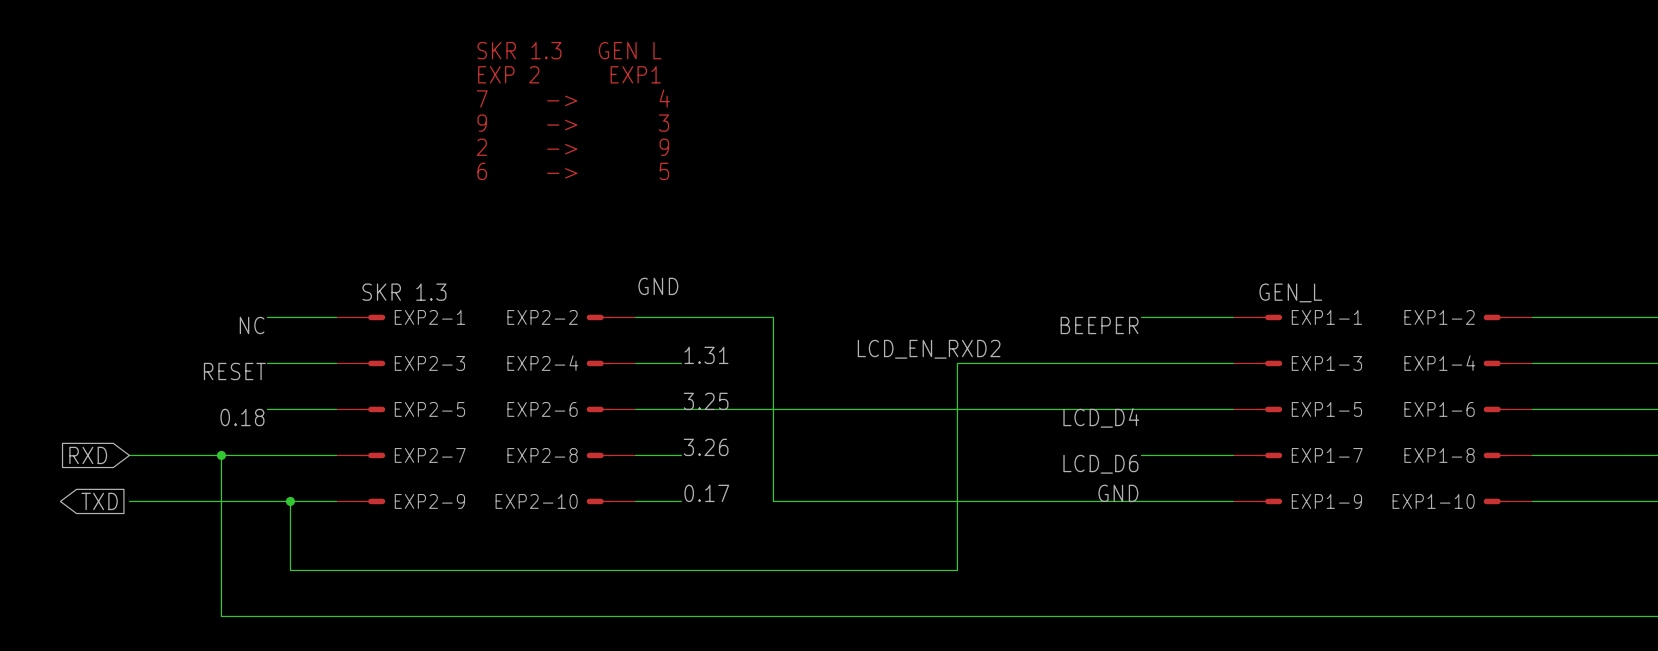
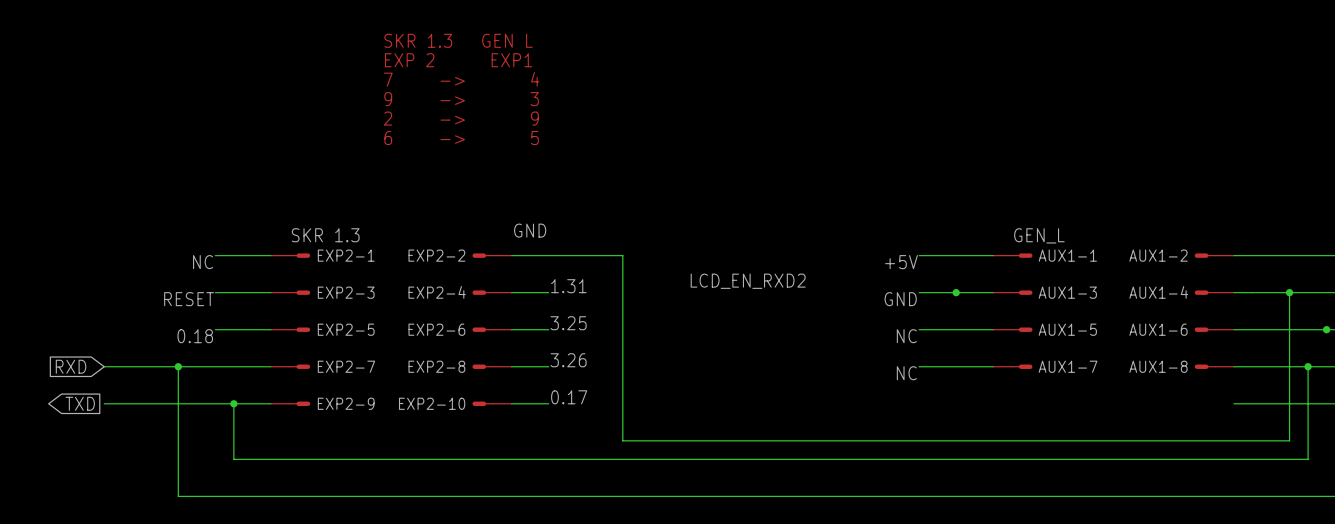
EXP1-1 name: EXP1-1 (1326, 317) -> AUX1-1 (1067, 255)
EXP1-2 name: EXP1-2 (1439, 317) -> AUX1-2 (1158, 255)
label: BEEPER (1099, 325) -> +5V (901, 262)
wire: (1141, 363) (957, 363) (957, 570) -> (1308, 366) (1308, 459) (770, 459)
junction: none -> (956, 292)
EXP1-3 name: EXP1-3 (1326, 363) -> AUX1-3 (1067, 292)
EXP1-4 name: EXP1-4 (1439, 363) -> AUX1-4 (1158, 292)
junction: none -> (1289, 292)
wire: (681, 409) (1141, 409) -> none
EXP1-5 name: EXP1-5 (1326, 409) -> AUX1-5 (1067, 329)
EXP1-6 name: EXP1-6 (1439, 409) -> AUX1-6 (1158, 329)
junction: none -> (1326, 329)
label: LCD_D4 (1101, 417) -> NC (906, 336)
EXP1-7 name: EXP1-7 (1327, 455) -> AUX1-7 (1068, 366)
EXP1-8 name: EXP1-8 (1439, 455) -> AUX1-8 (1158, 366)
junction: none -> (1308, 366)
label: LCD_D6 (1100, 464) -> NC (906, 373)
label position: GND (1118, 493) -> GND (900, 299)
wire: (773, 501) (1233, 501) -> (622, 403) (622, 440) (1289, 440) (1289, 292)
EXP1-9: (1257, 501) -> none
EXP1-10: (1508, 501) -> none

